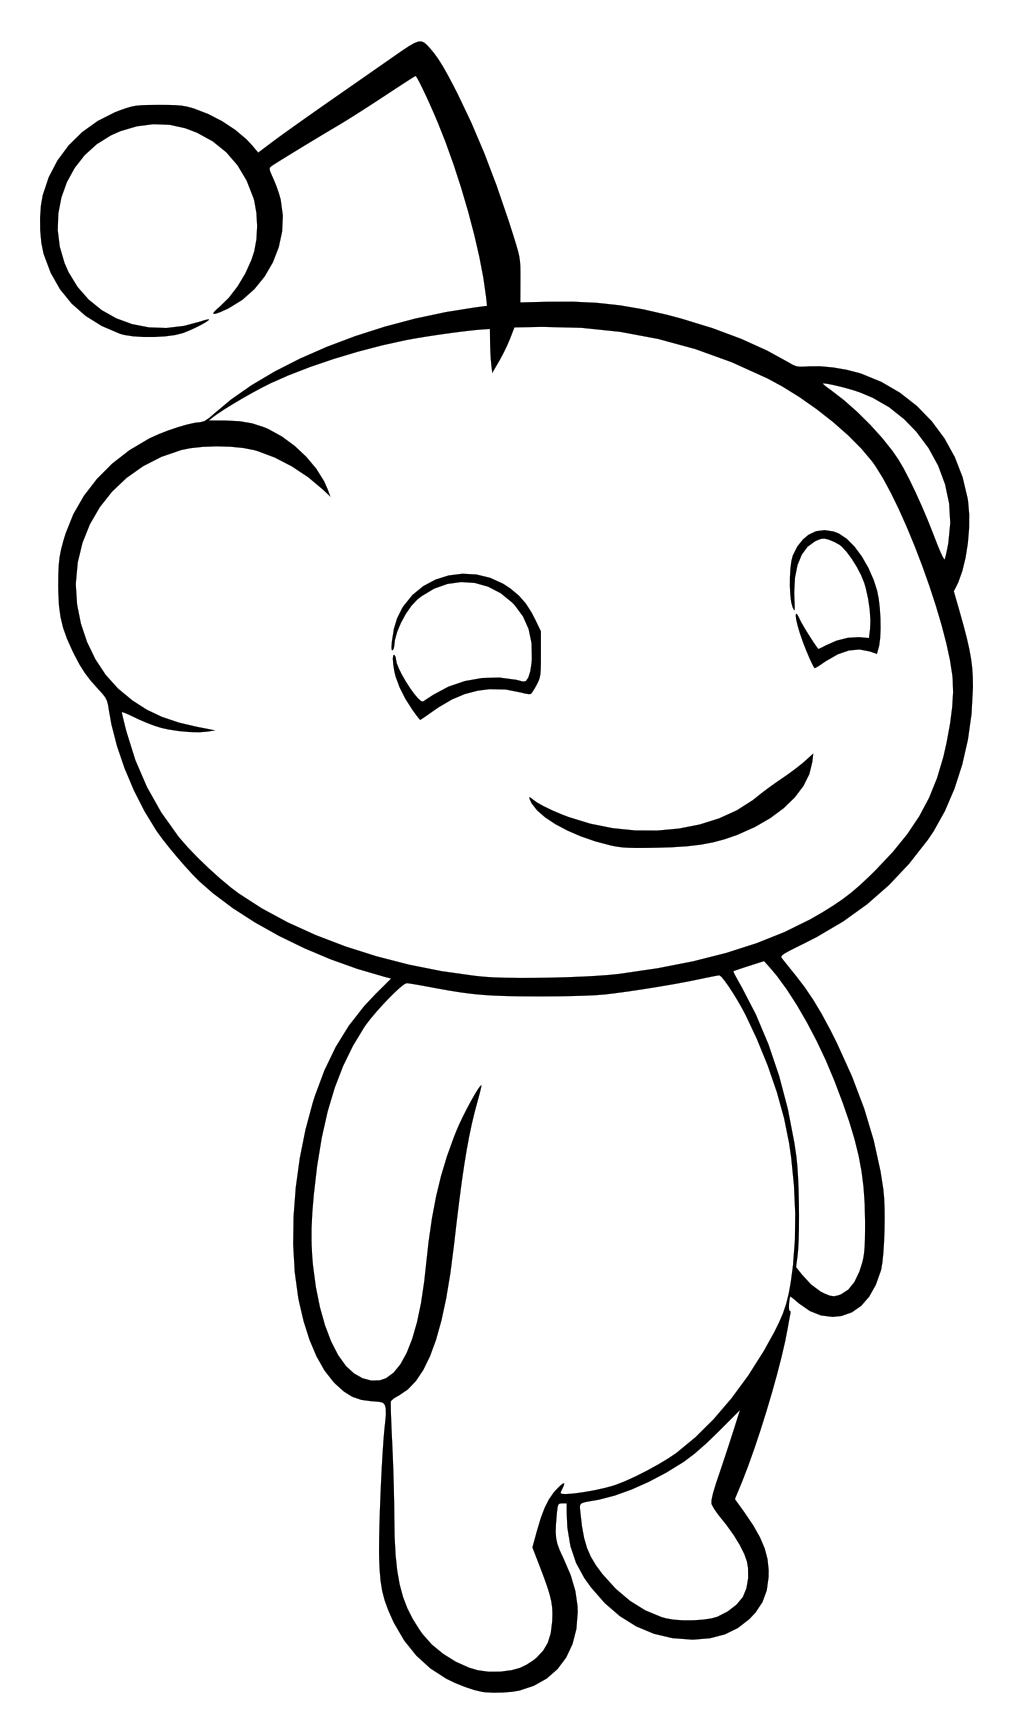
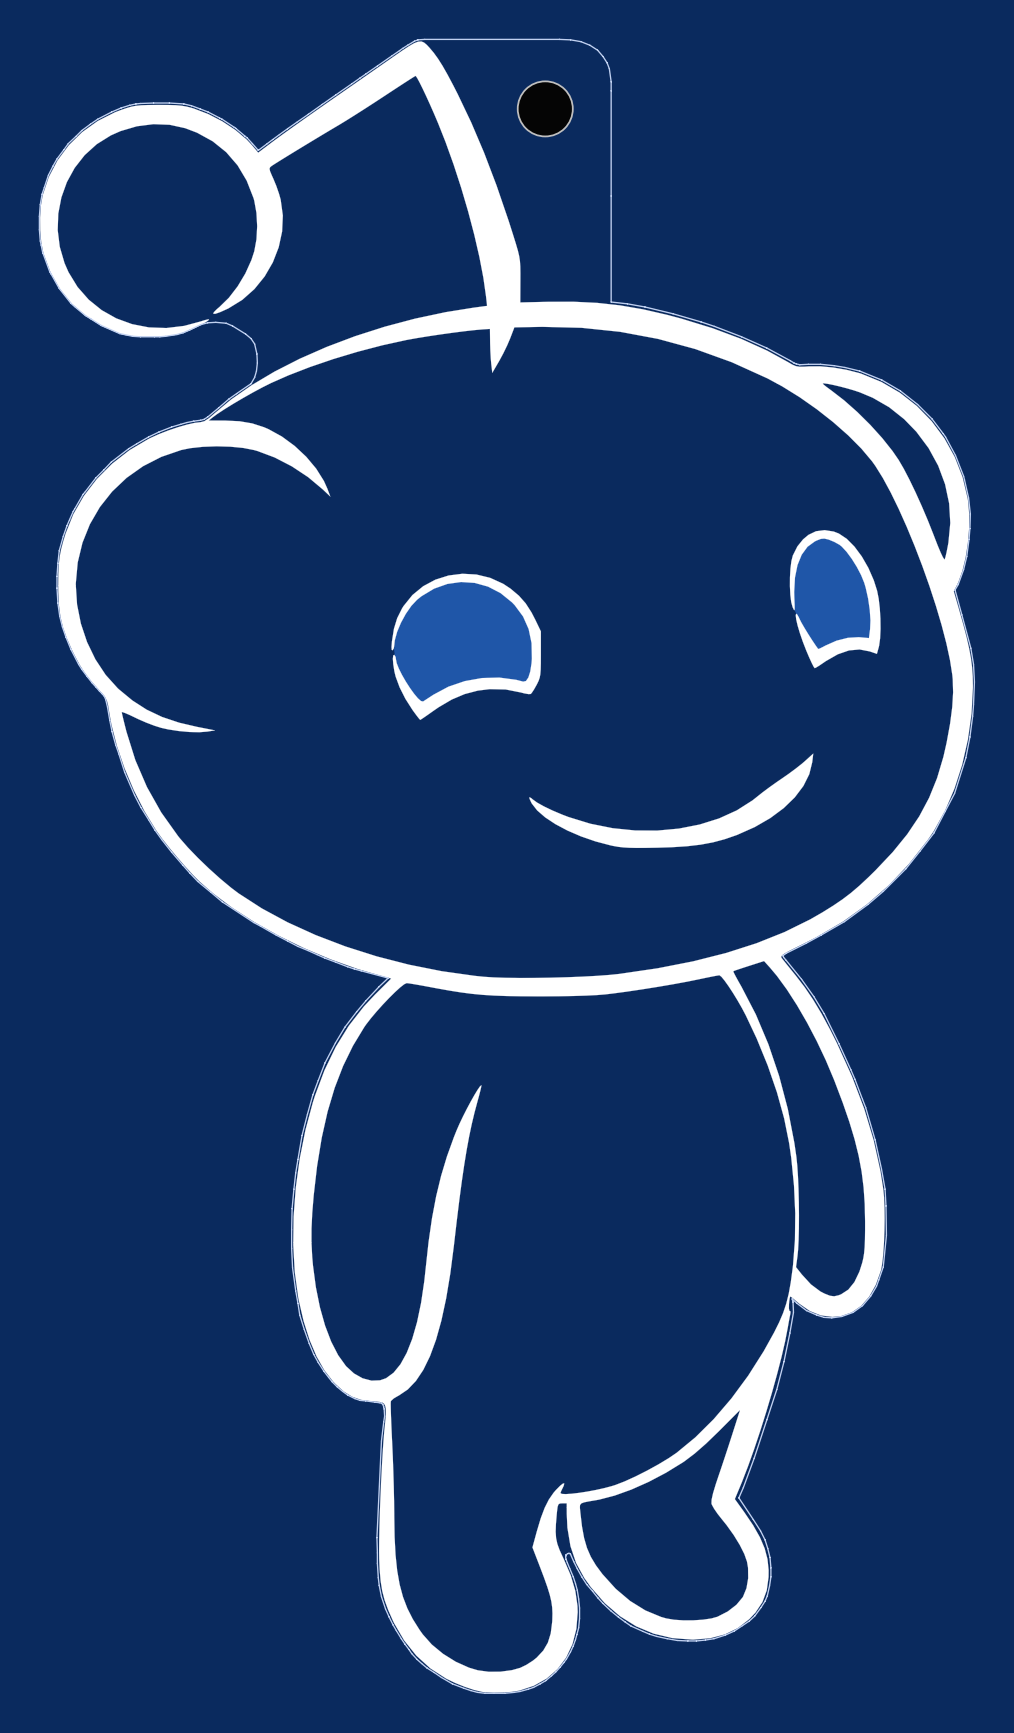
board edge: none -> (559, 39) (570, 39) (580, 41) (589, 45) (603, 56) (609, 68) (611, 81) (611, 302) (644, 306) (714, 326) (766, 348) (796, 363) (834, 365) (859, 371) (881, 380) (900, 390) (932, 418) (945, 436) (963, 476) (970, 514) (966, 556) (955, 589) (973, 664) (973, 704) (965, 757) (954, 793) (933, 833) (905, 868) (867, 904) (844, 921) (783, 955) (824, 1013) (850, 1069) (865, 1107) (875, 1140) (885, 1189) (886, 1235) (883, 1266) (876, 1286) (862, 1305) (853, 1312) (841, 1316) (824, 1317) (806, 1310) (792, 1298) (793, 1312) (776, 1389) (738, 1497) (760, 1530) (767, 1548) (770, 1576) (765, 1601) (749, 1621) (725, 1635) (696, 1640) (677, 1640) (656, 1636) (631, 1626) (610, 1610) (586, 1584) (568, 1553) (566, 1554) (566, 1559) (577, 1590) (579, 1618) (575, 1639) (566, 1659) (551, 1675) (533, 1687) (514, 1692) (485, 1693) (452, 1683) (427, 1668) (411, 1653) (389, 1617) (381, 1596) (377, 1563) (383, 1406) (381, 1403) (360, 1400) (347, 1395) (332, 1381) (324, 1371) (313, 1354) (299, 1315) (292, 1267) (292, 1208) (295, 1172) (302, 1135) (312, 1094) (325, 1062) (344, 1027) (366, 1000) (388, 978) (354, 969) (325, 958) (276, 935) (222, 901) (189, 872) (154, 830) (134, 795) (115, 744) (105, 699) (78, 664) (66, 637) (59, 616) (56, 588) (59, 550) (66, 525) (83, 494) (111, 462) (128, 448) (148, 436) (171, 427) (204, 419) (251, 383) (254, 377) (257, 362) (254, 344) (245, 334) (226, 323) (207, 322) (183, 332) (159, 336) (132, 336) (119, 333) (101, 325) (70, 303) (49, 271) (40, 241) (39, 216) (42, 194) (48, 175) (68, 143) (97, 119) (121, 107) (135, 103) (153, 103) (191, 105) (208, 112) (235, 128) (258, 150) (402, 48) (418, 39) (424, 39) (559, 39)
via: none -> (545, 108)
drawing: none -> [793, 534, 877, 659]
drawing: none -> [394, 578, 539, 710]

